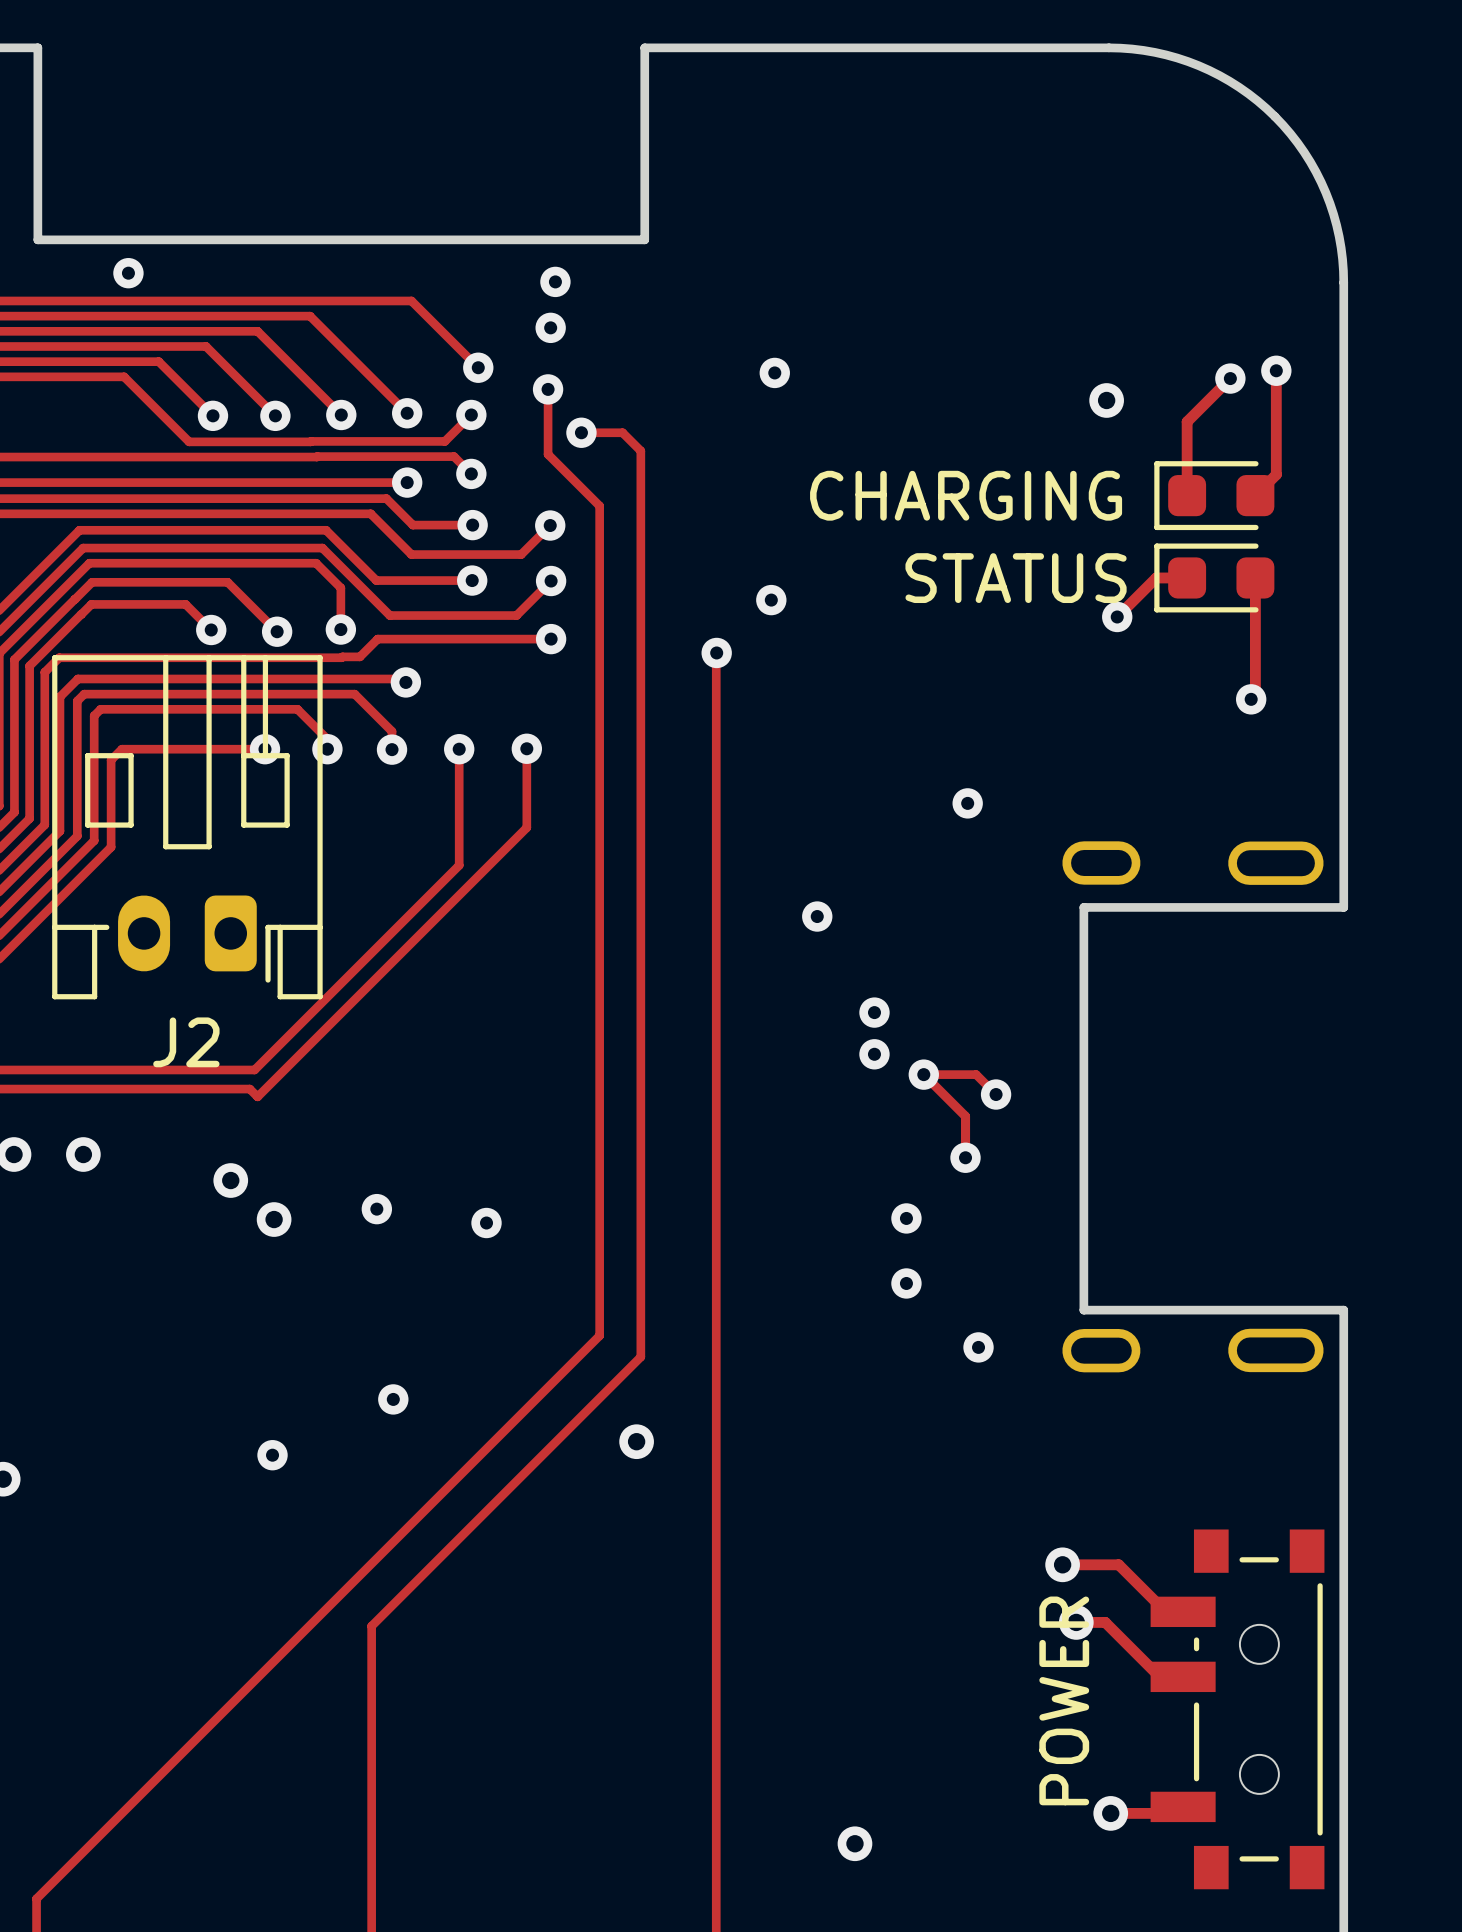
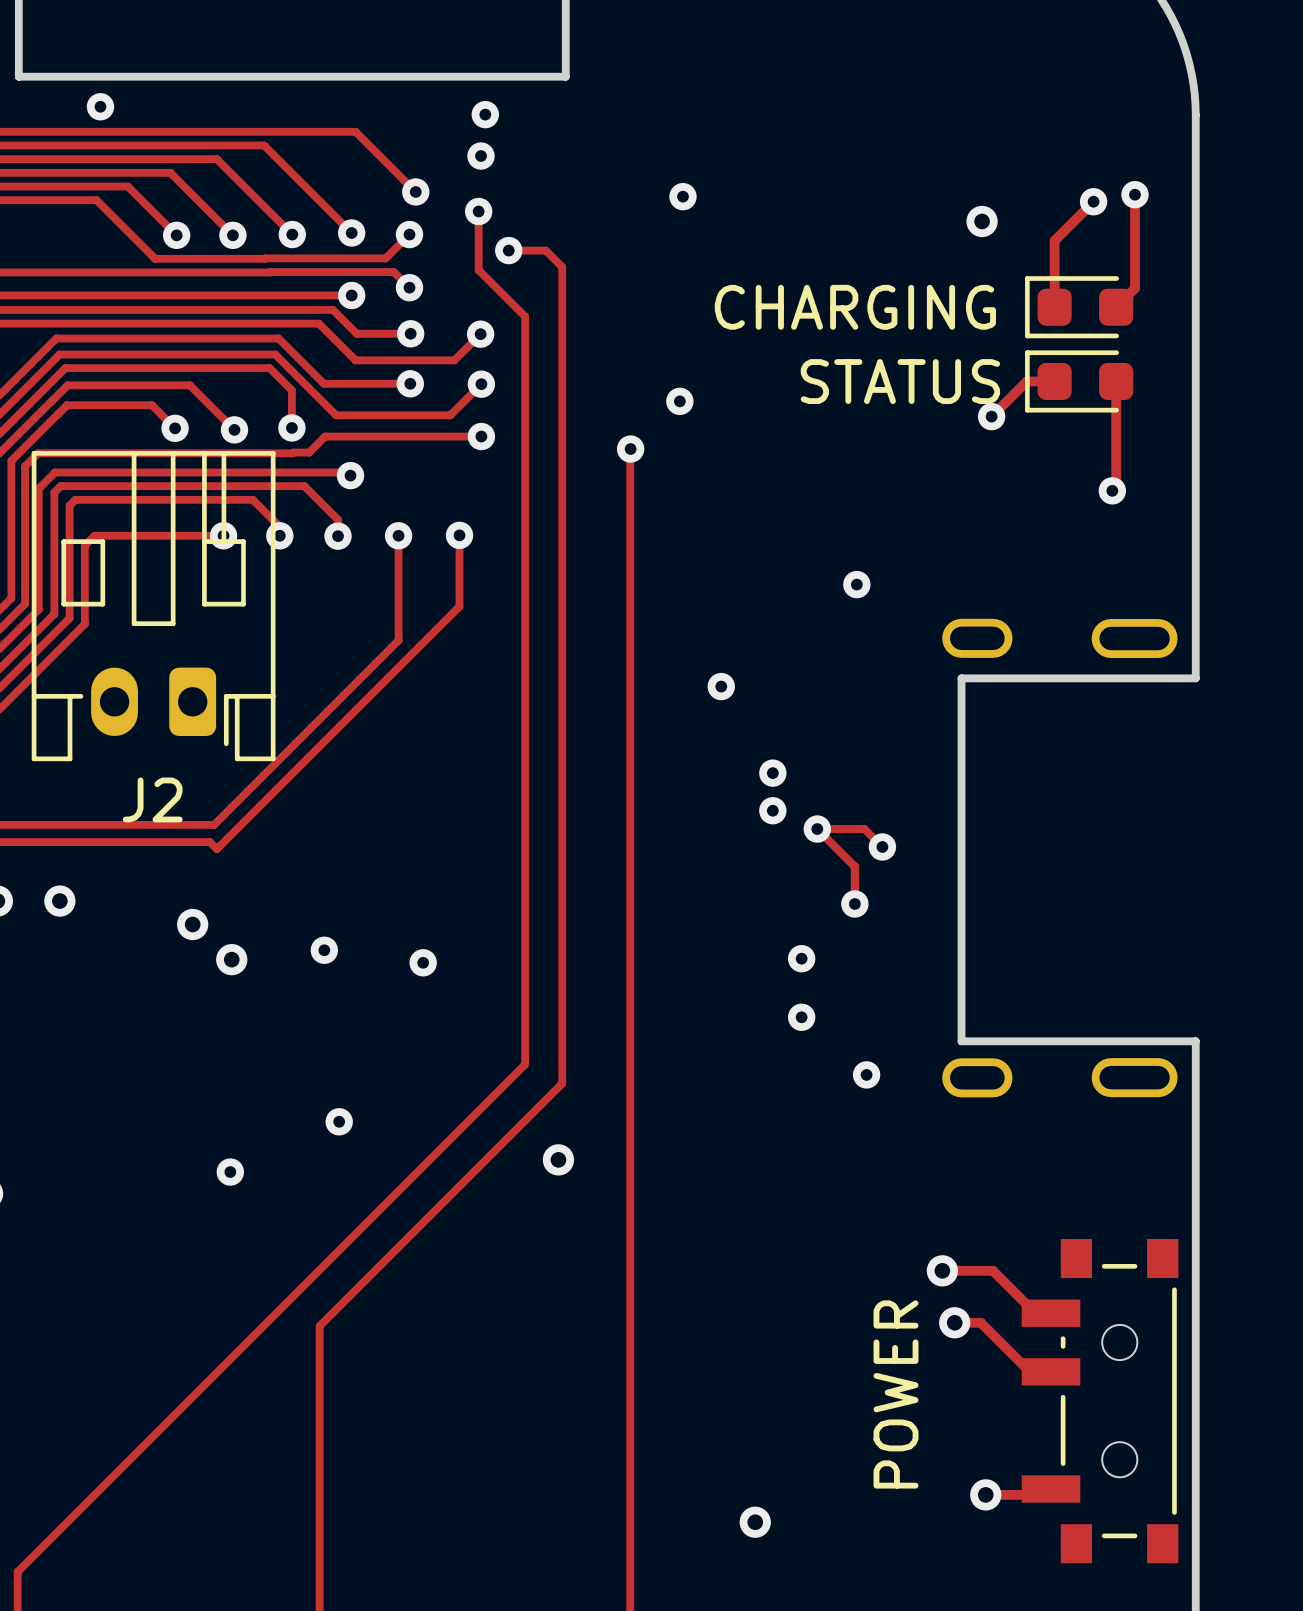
text position: POWER (1064, 1700) -> POWER (896, 1394)

